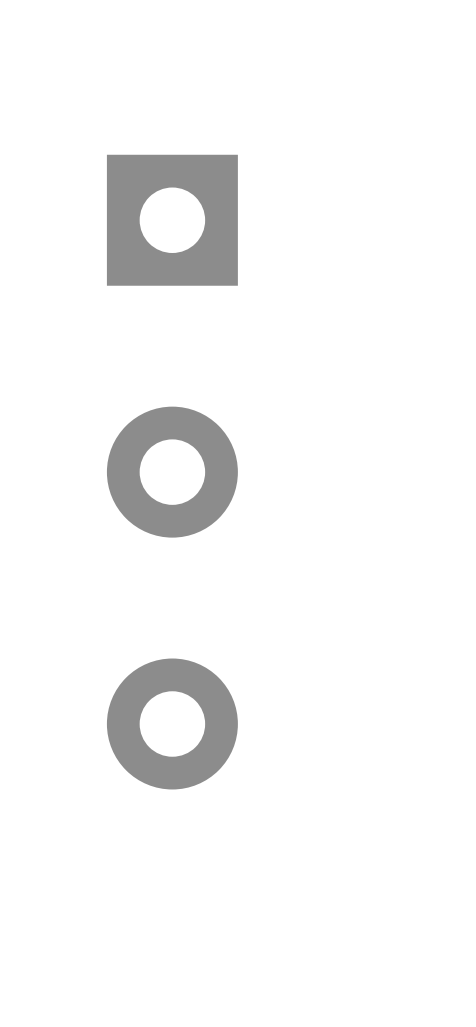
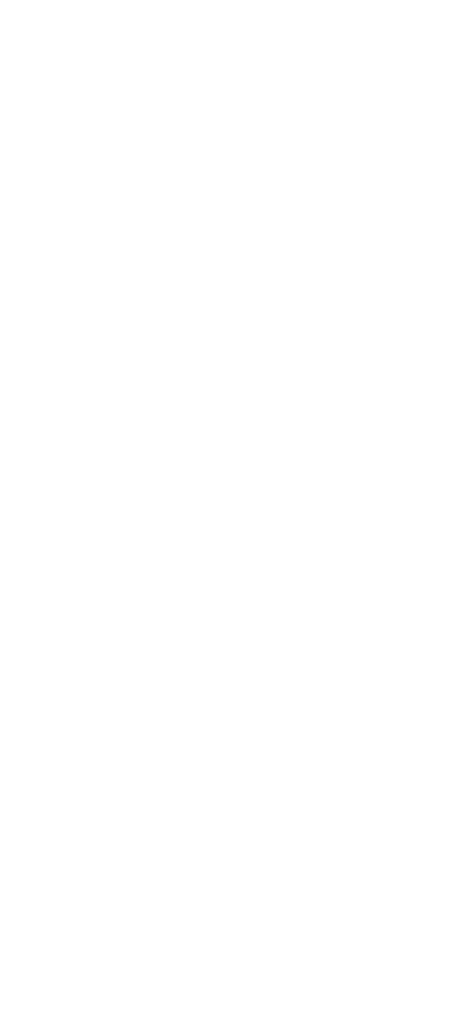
part: (172, 472) -> none

